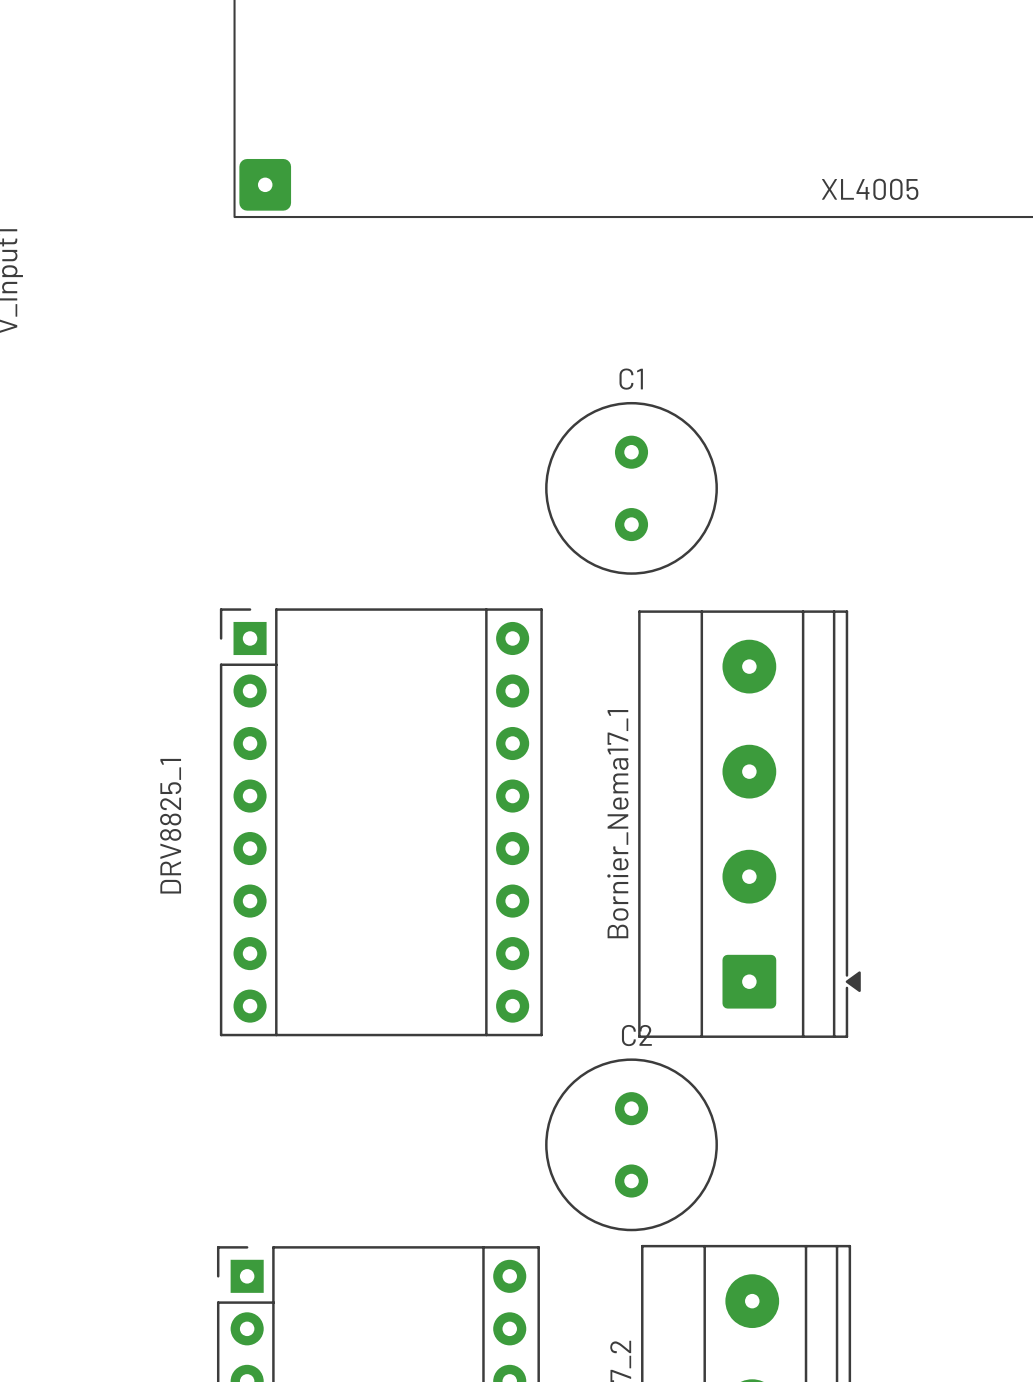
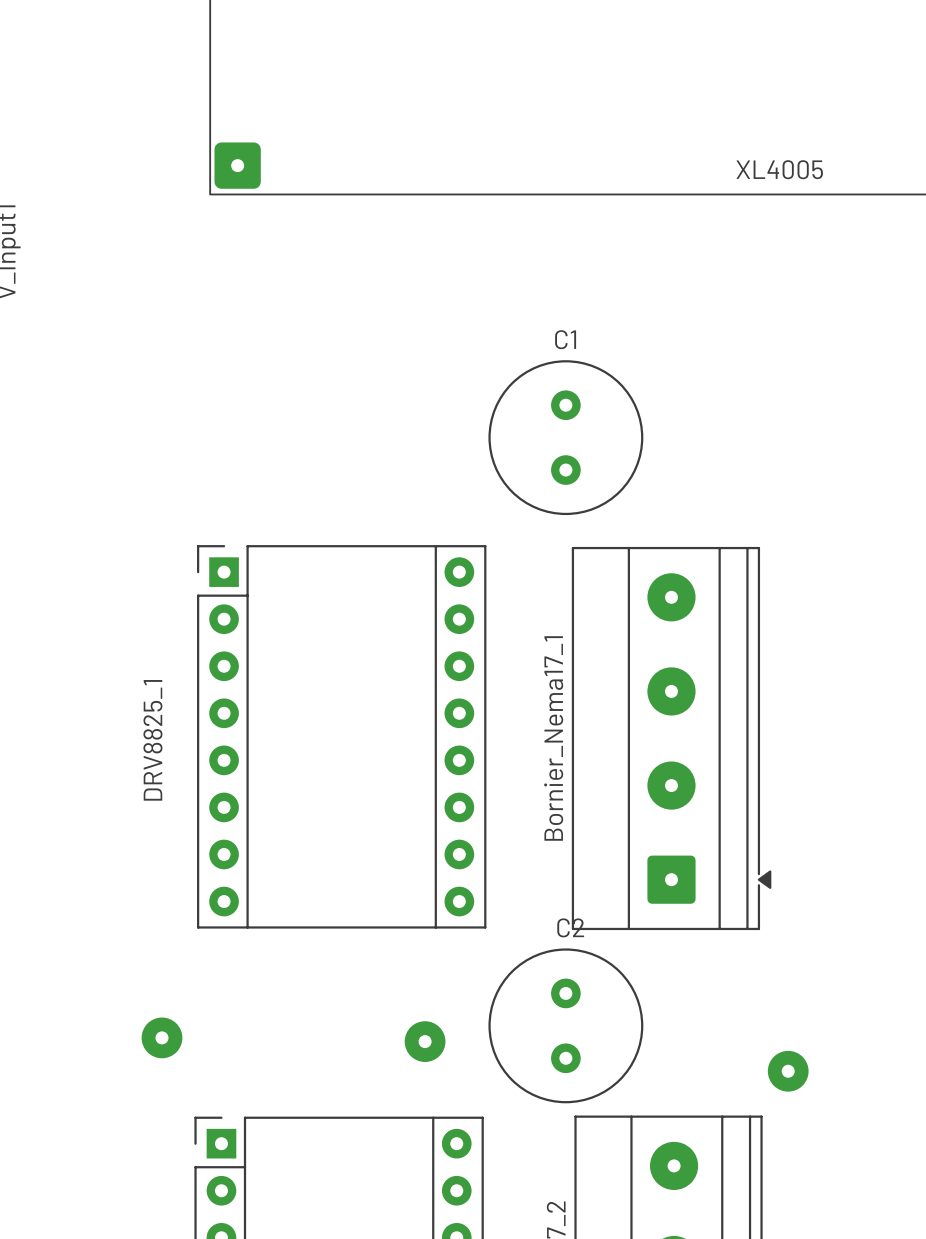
part: none -> (161, 1037)
part: none -> (425, 1041)
part: none -> (788, 1071)

